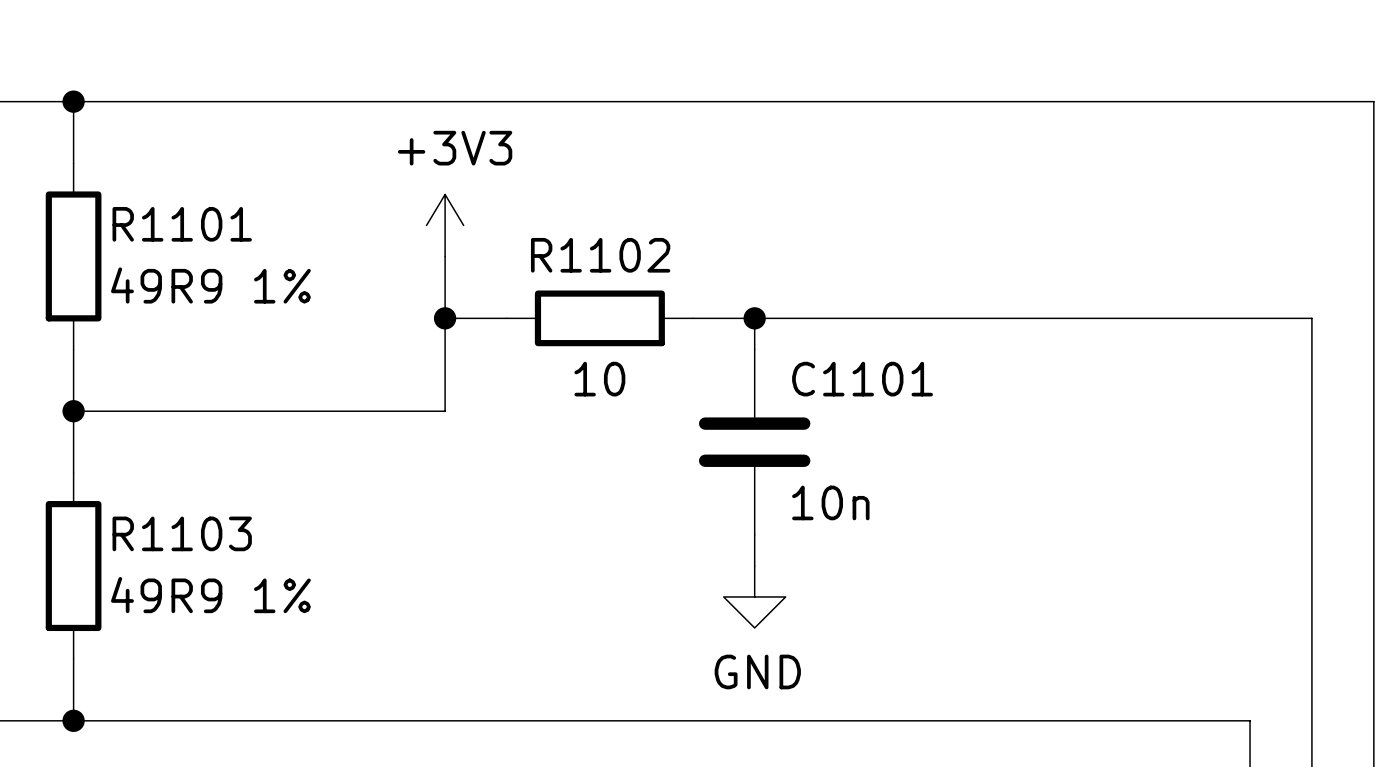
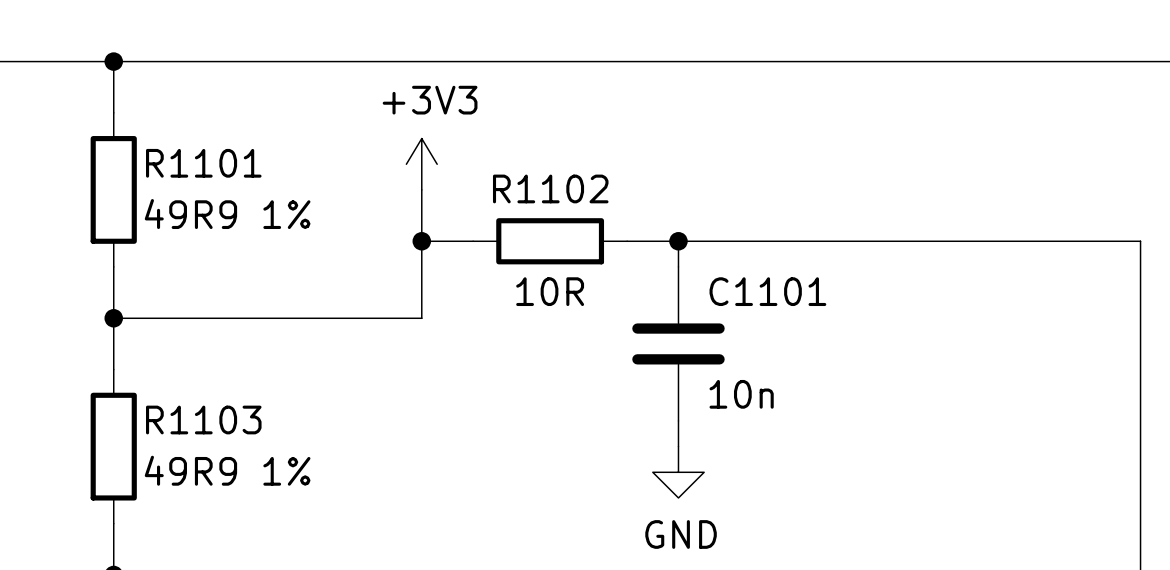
R1102 value: 10 (599, 379) -> 10R (550, 291)

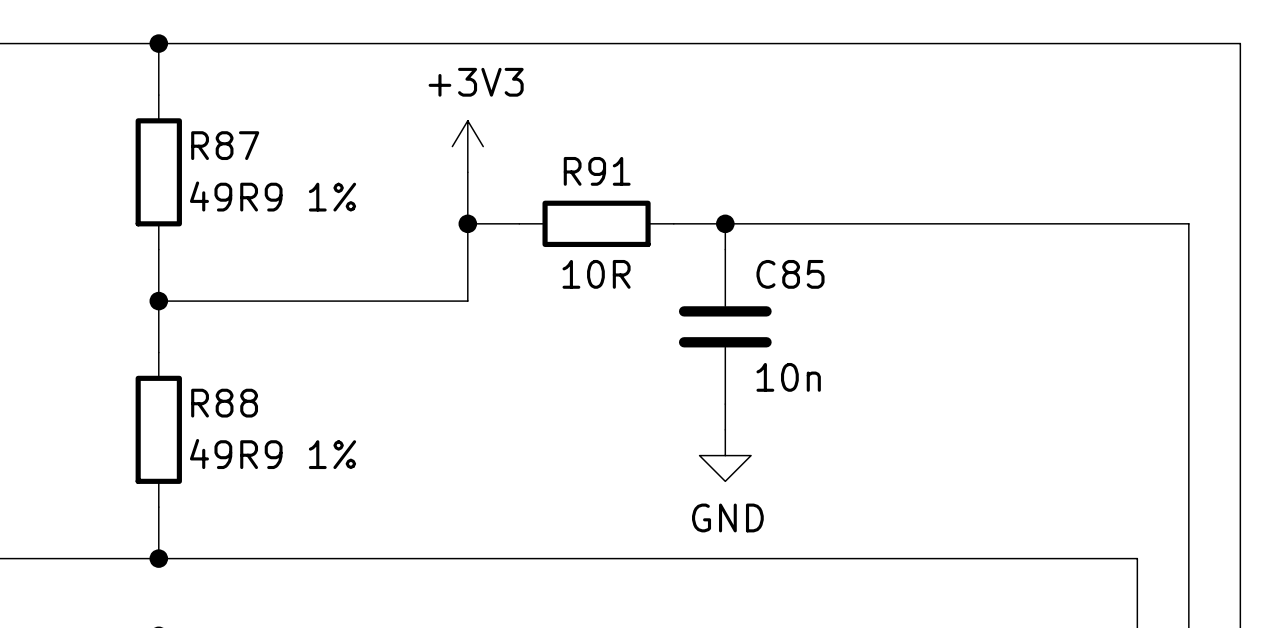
R1101 name: R1101 (203, 163) -> R87 (225, 145)
R1102 name: R1102 (550, 188) -> R91 (597, 171)
C1101 name: C1101 (767, 291) -> C85 (790, 274)
R1103 name: R1103 (203, 420) -> R88 (224, 403)

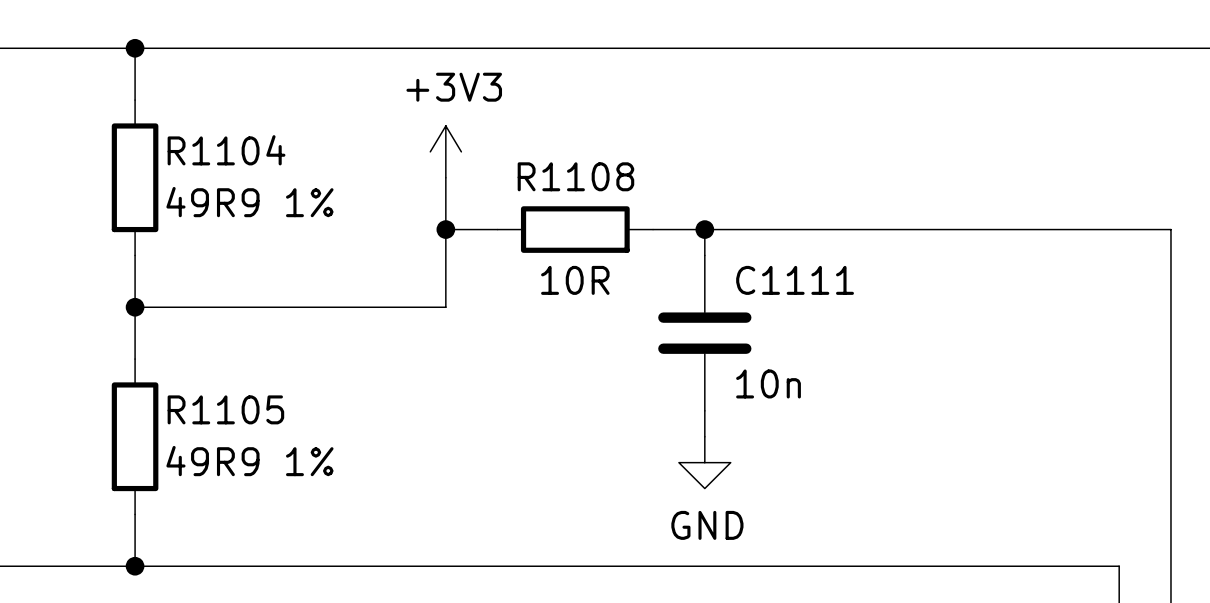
R87 name: R87 (225, 145) -> R1104 (226, 150)
R91 name: R91 (597, 171) -> R1108 (575, 176)
C85 name: C85 (790, 274) -> C1111 (795, 280)
R88 name: R88 (224, 403) -> R1105 (225, 409)

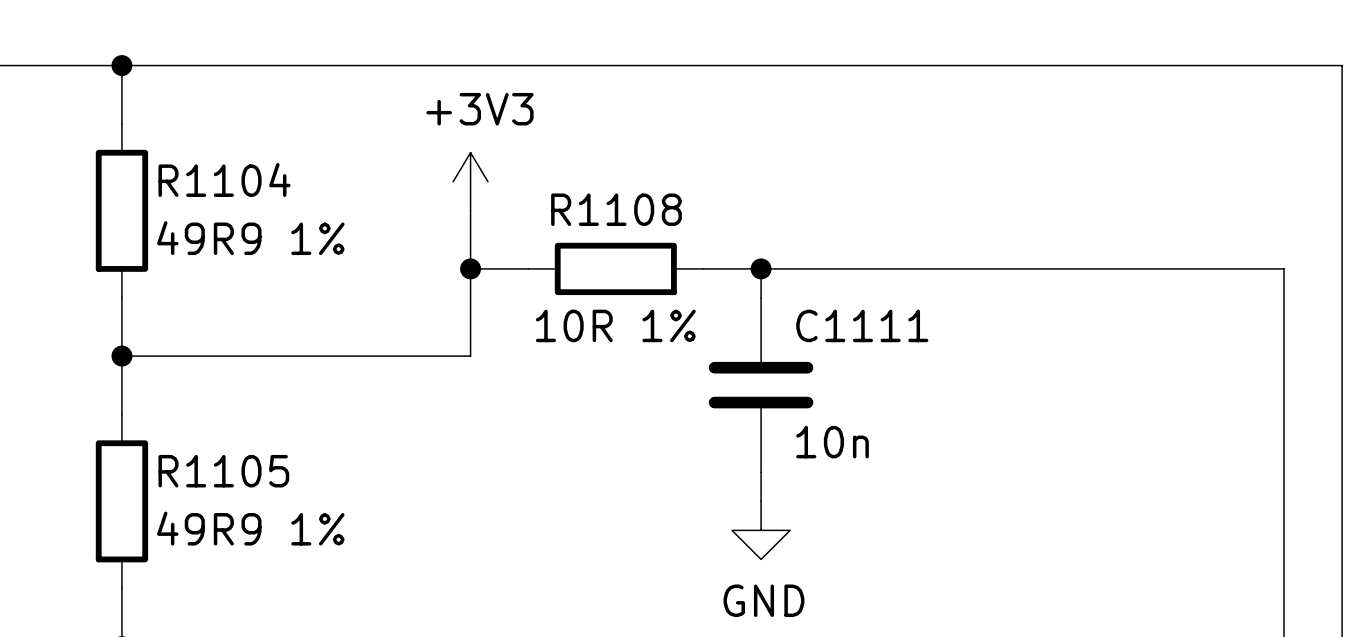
R1108 value: 10R (575, 280) -> 10R 1% (615, 325)

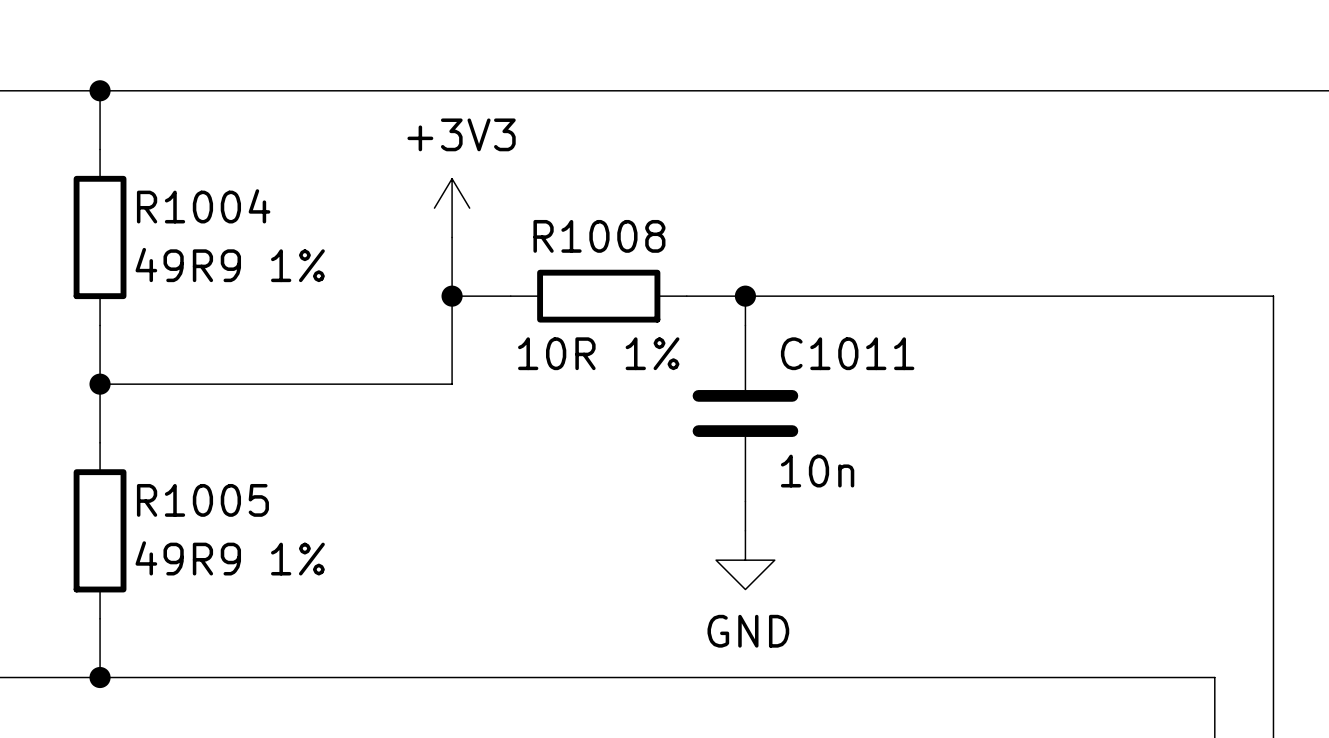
R1104 name: R1104 (224, 179) -> R1004 (203, 206)
R1108 name: R1108 (616, 209) -> R1008 (599, 236)
C1111 name: C1111 (862, 325) -> C1011 (847, 353)
R1105 name: R1105 (223, 471) -> R1005 (202, 500)

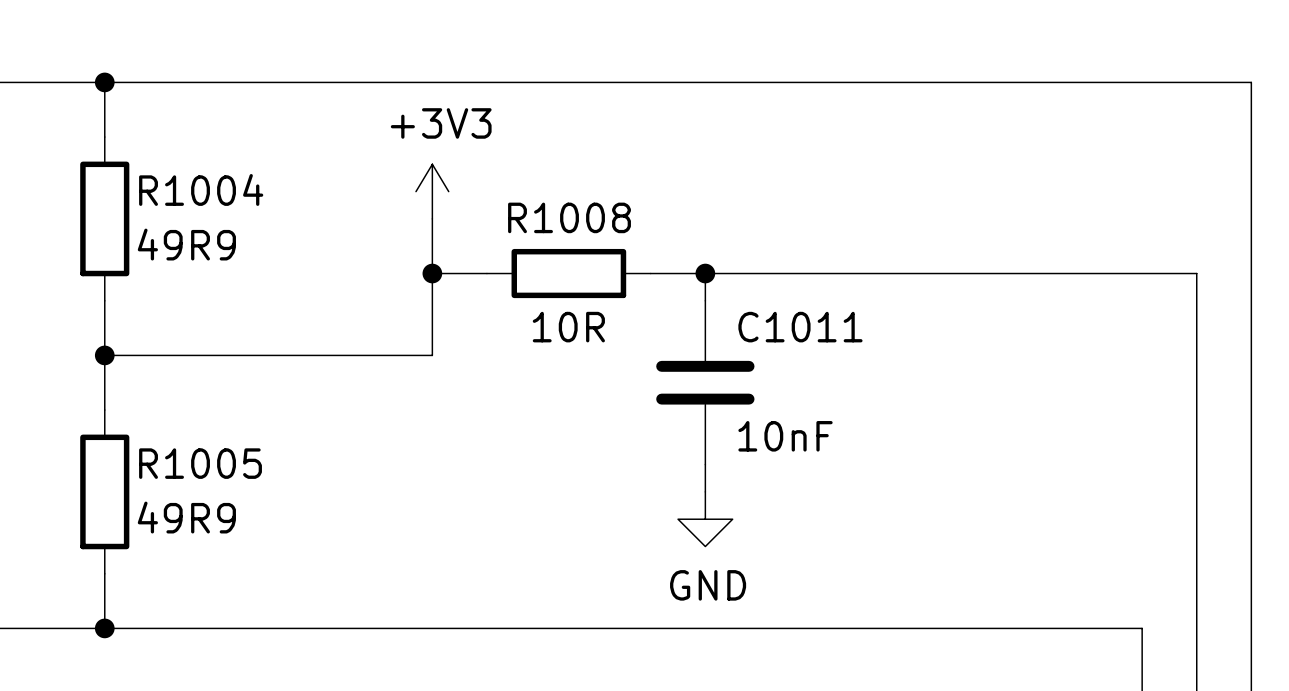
R1004 value: 49R9 1% (230, 265) -> 49R9 (186, 244)
R1008 value: 10R 1% (598, 353) -> 10R (568, 327)
C1011 value: 10n (817, 471) -> 10nF (785, 436)
R1005 value: 49R9 1% (230, 558) -> 49R9 (186, 517)

